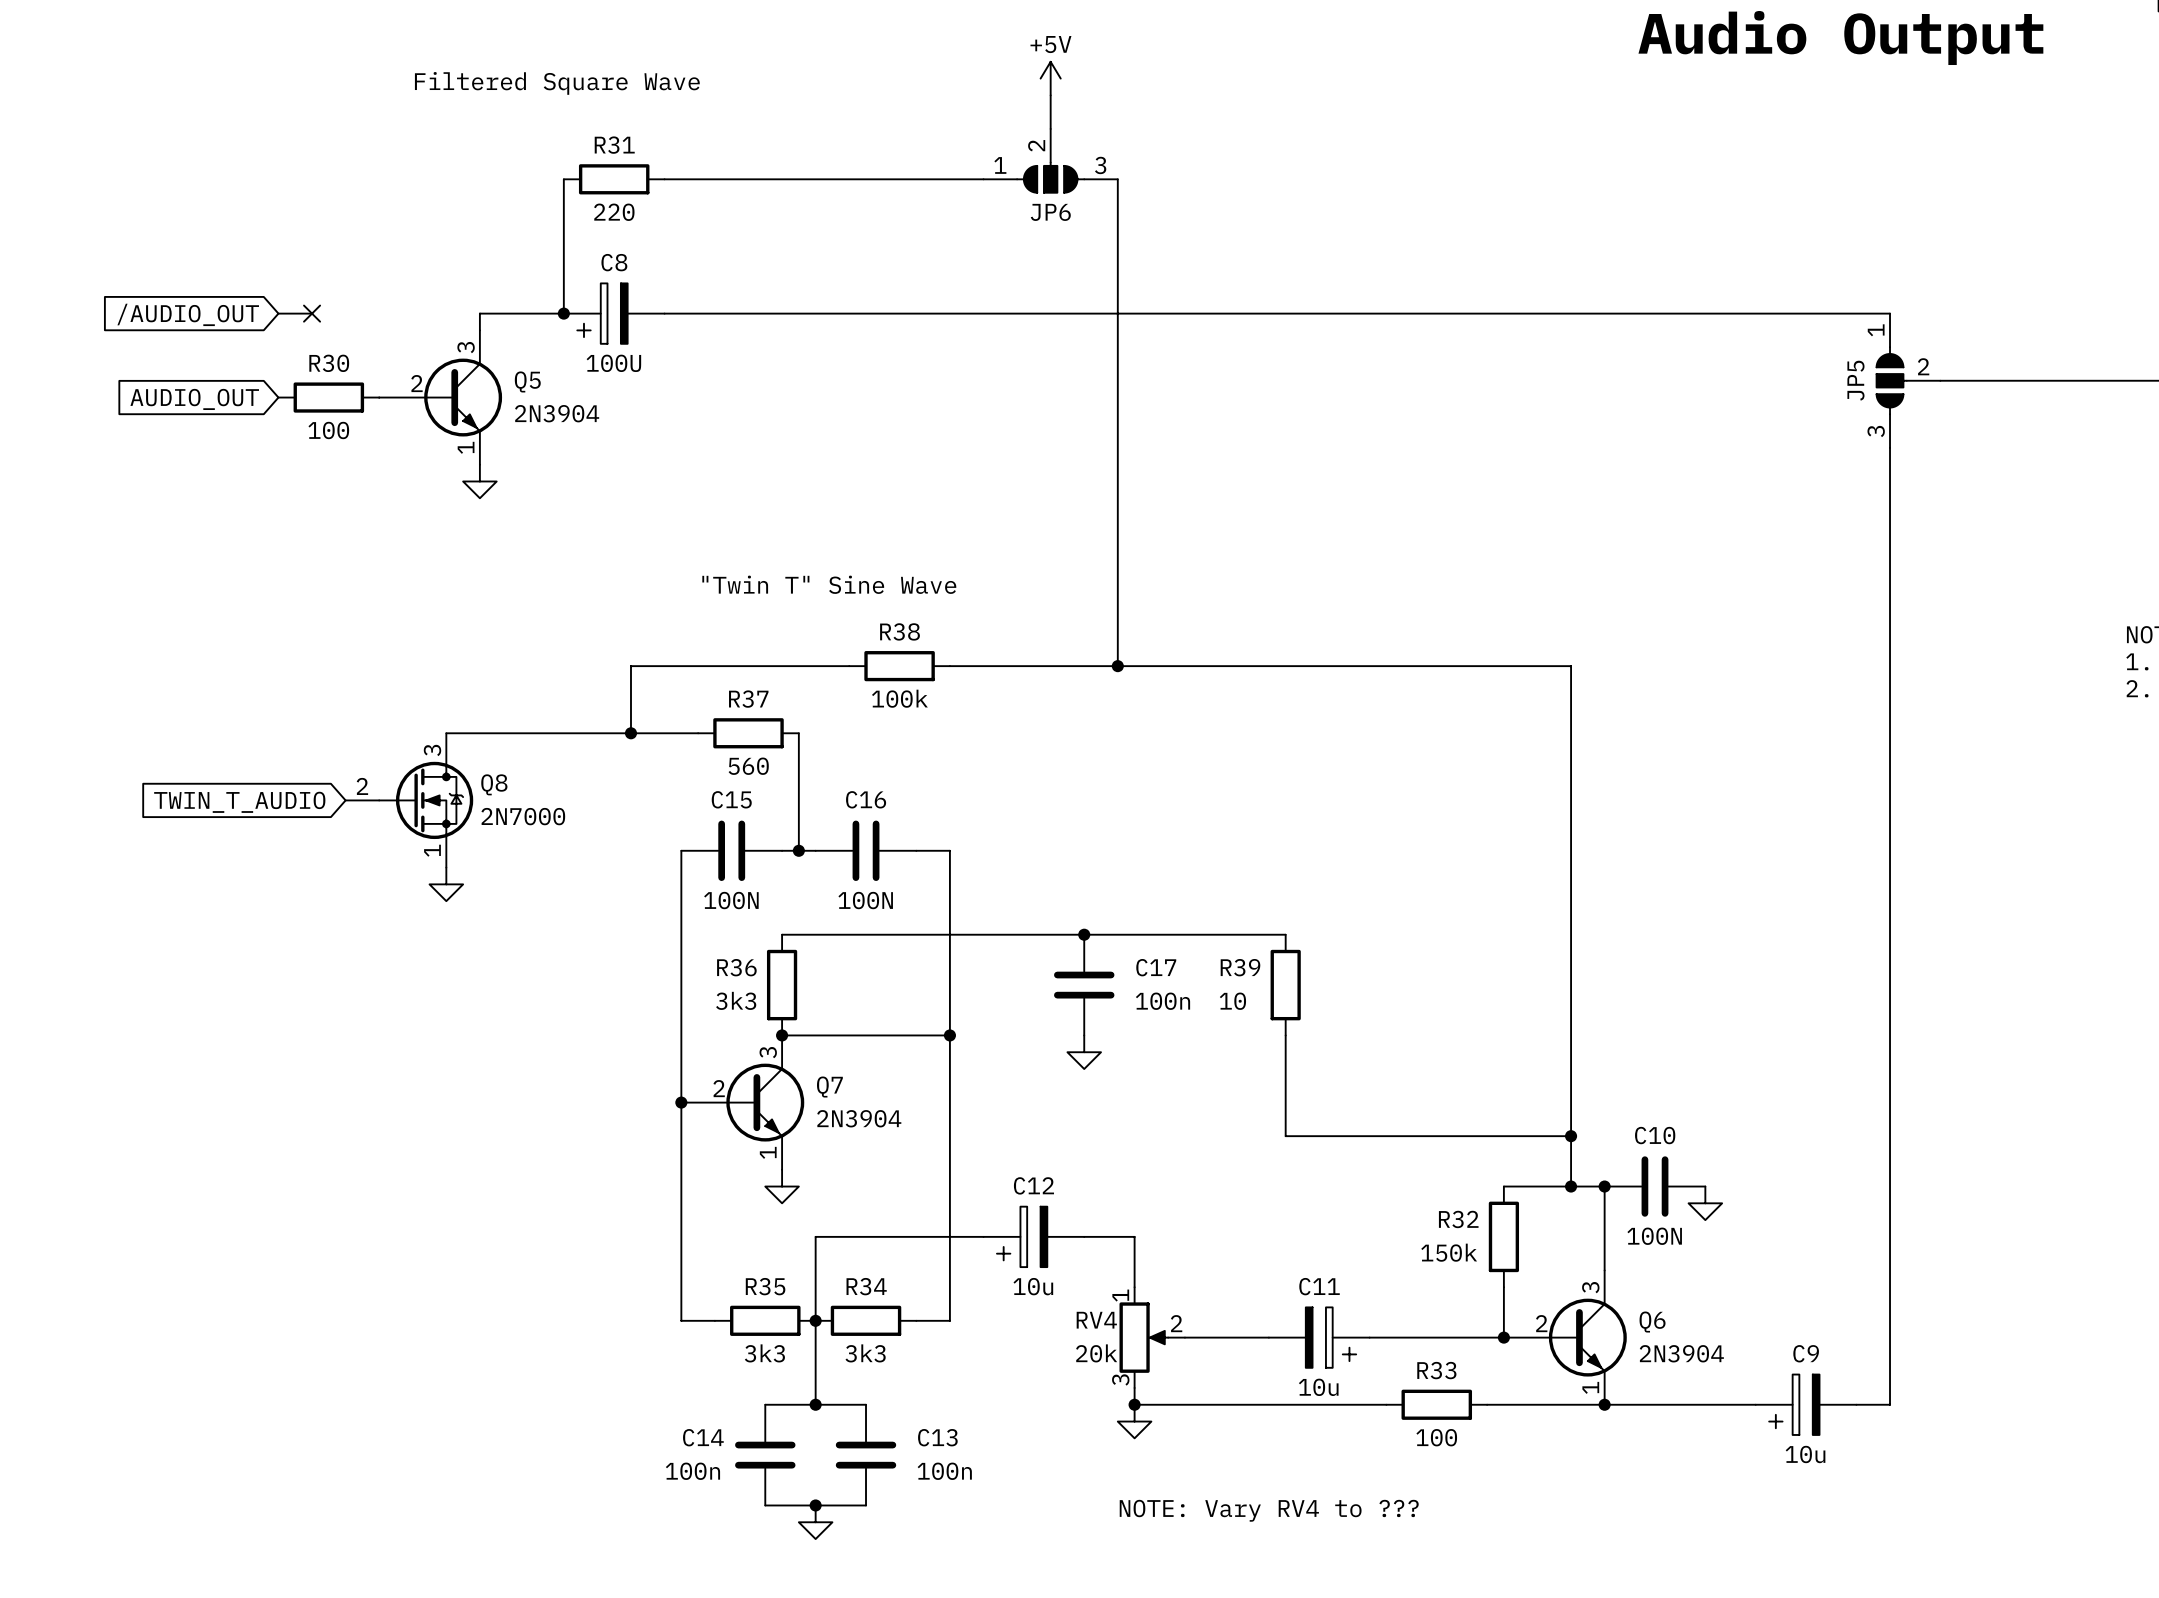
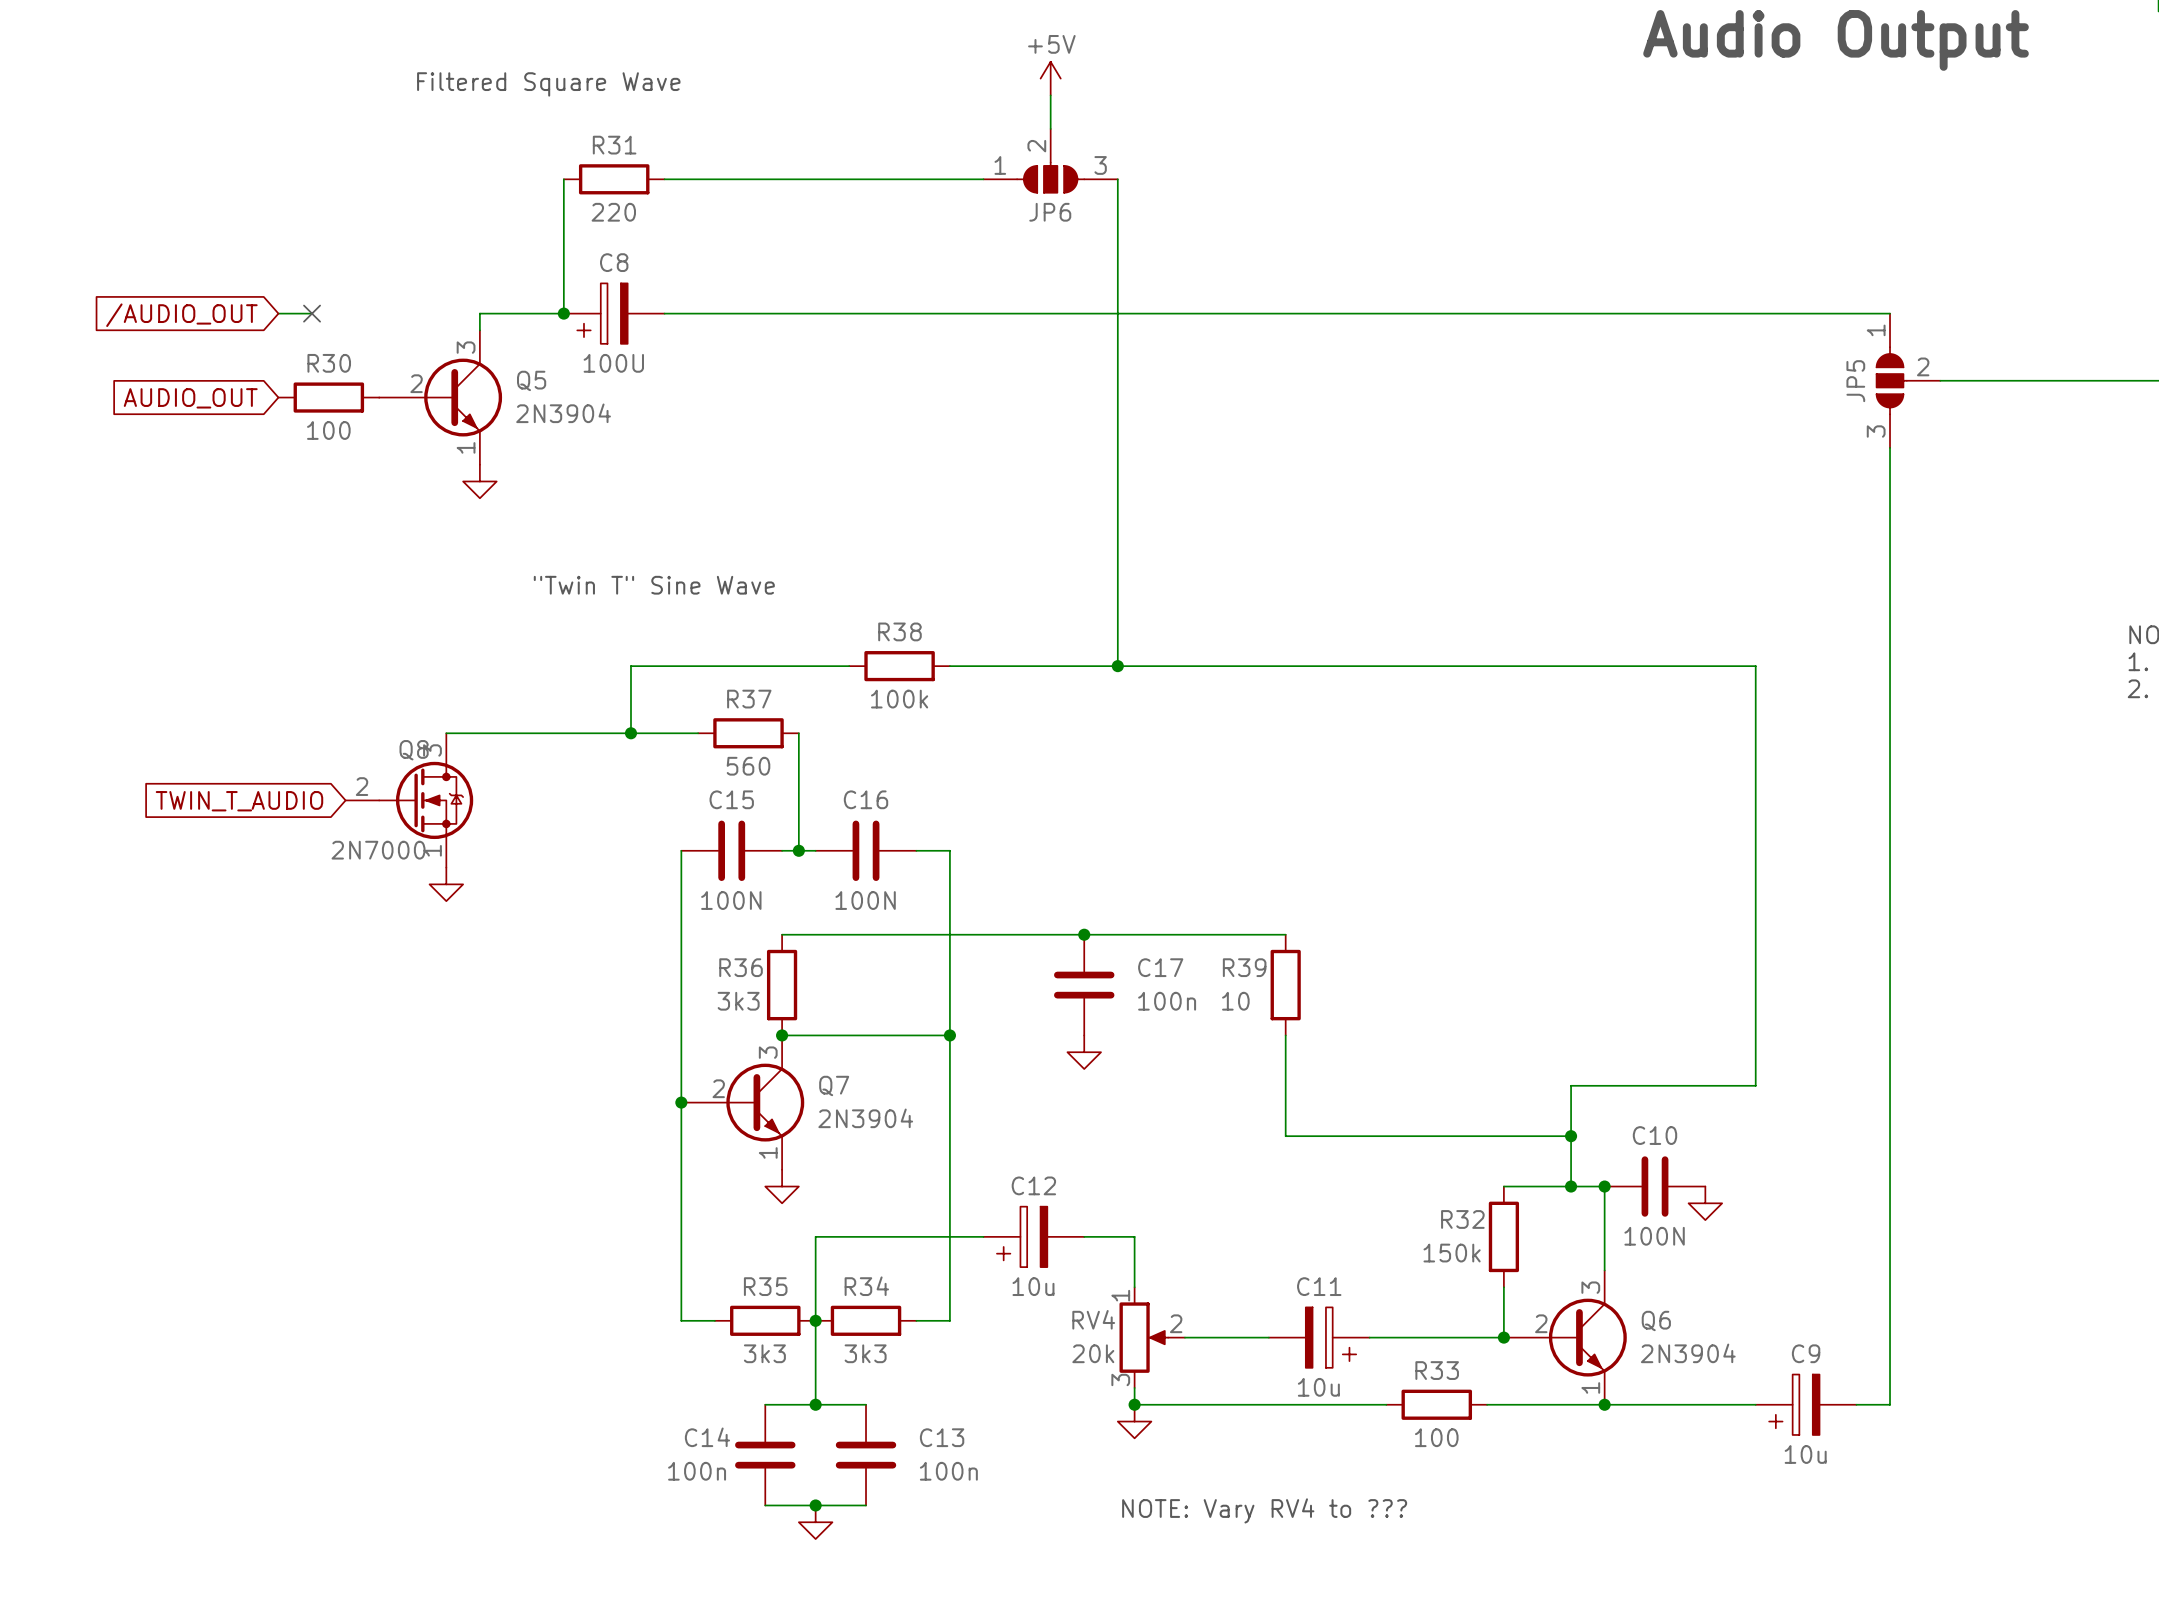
text position: "Twin T" Sine Wave (829, 584) -> "Twin T" Sine Wave (654, 585)
wire: (1571, 666) (1571, 1085) -> (1571, 666) (1755, 666) (1755, 1085) (1571, 1085)
Q8 name position: Q8 (494, 784) -> Q8 (414, 750)
Q8 value position: 2N7000 (523, 816) -> 2N7000 (378, 850)

